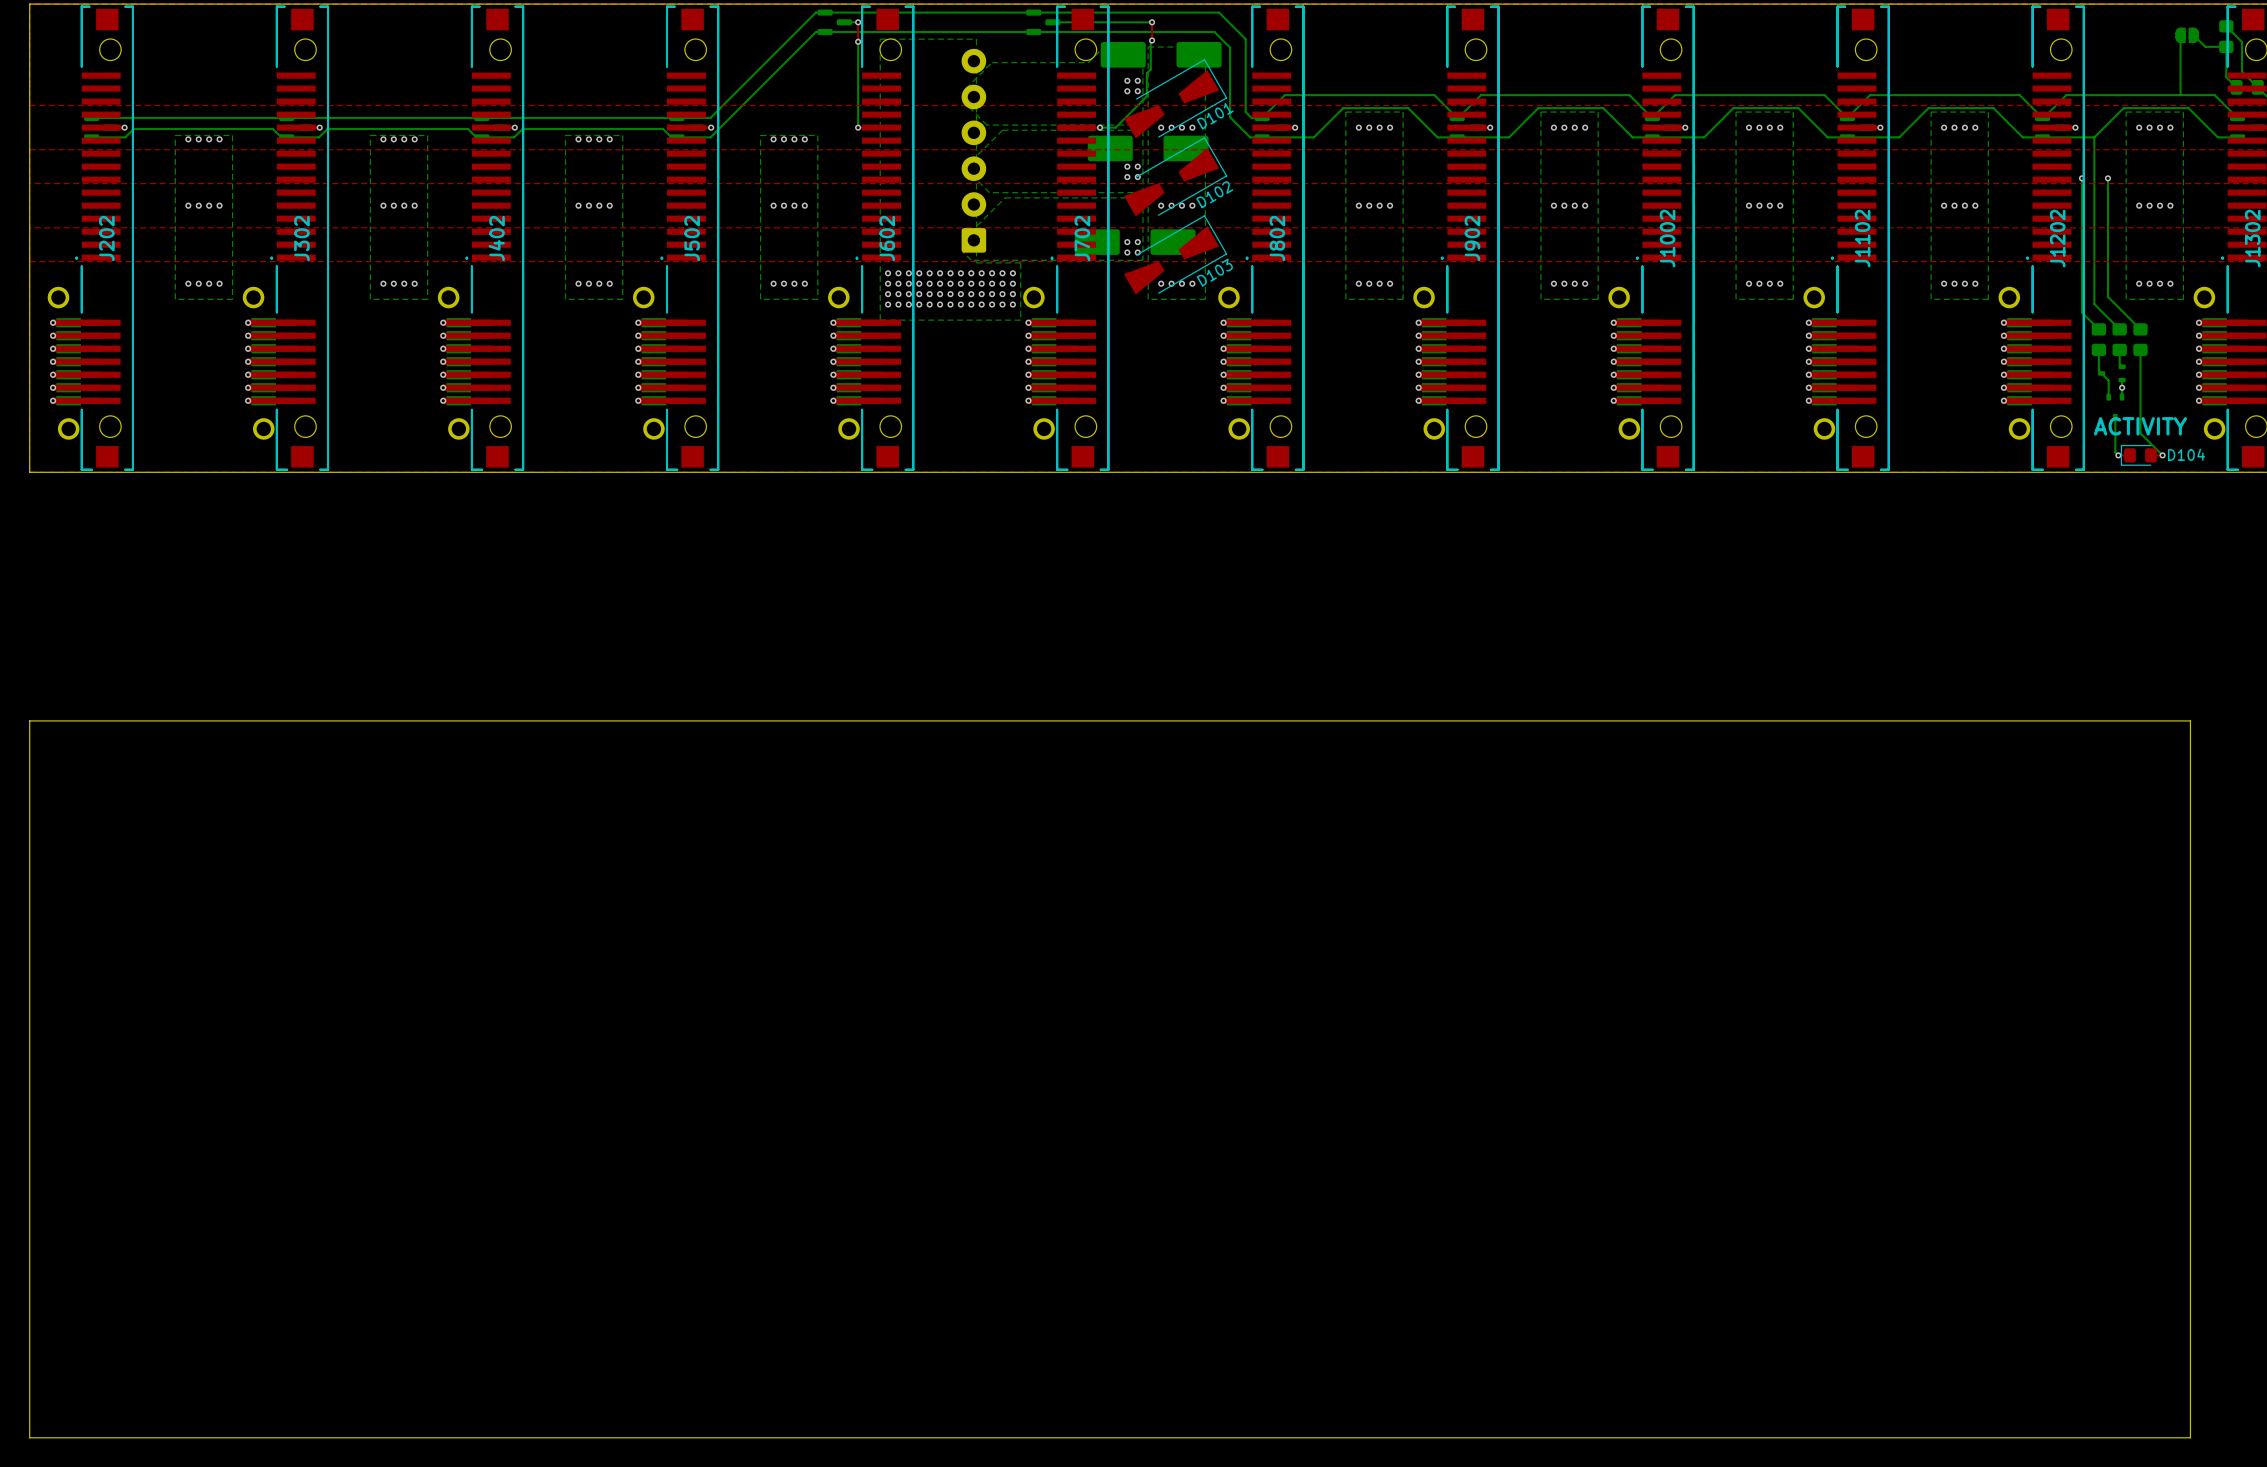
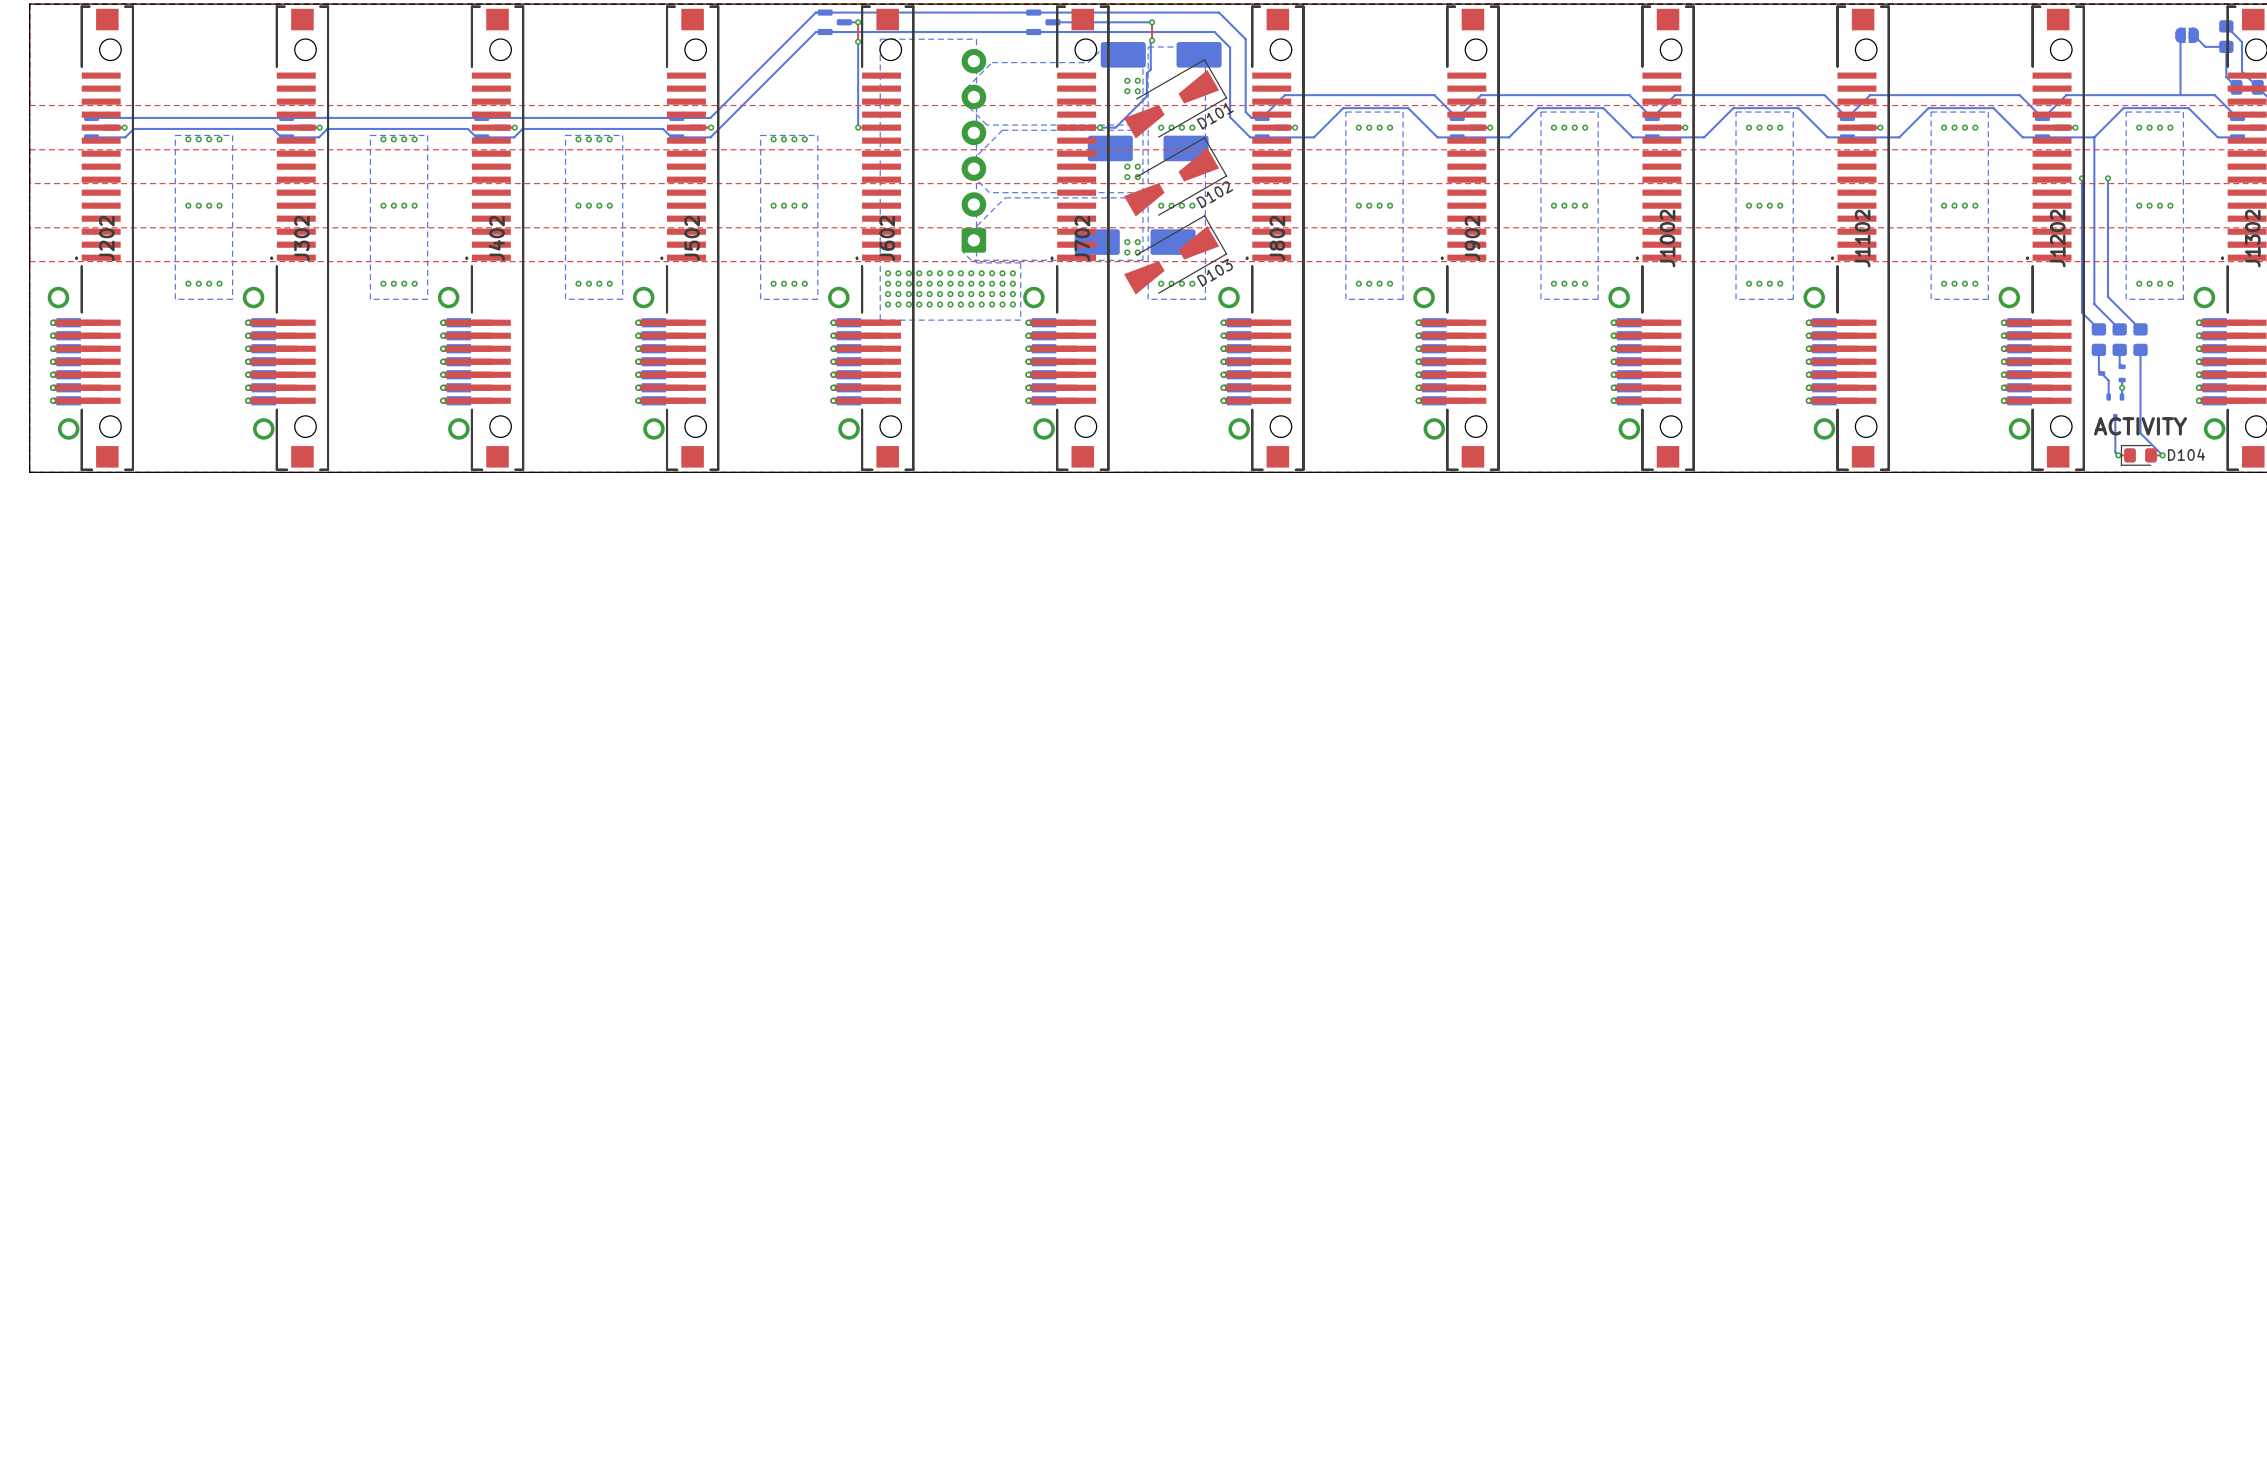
board edge: (29, 720) (2190, 720) (2190, 1437) (29, 1437) (29, 720) -> none

